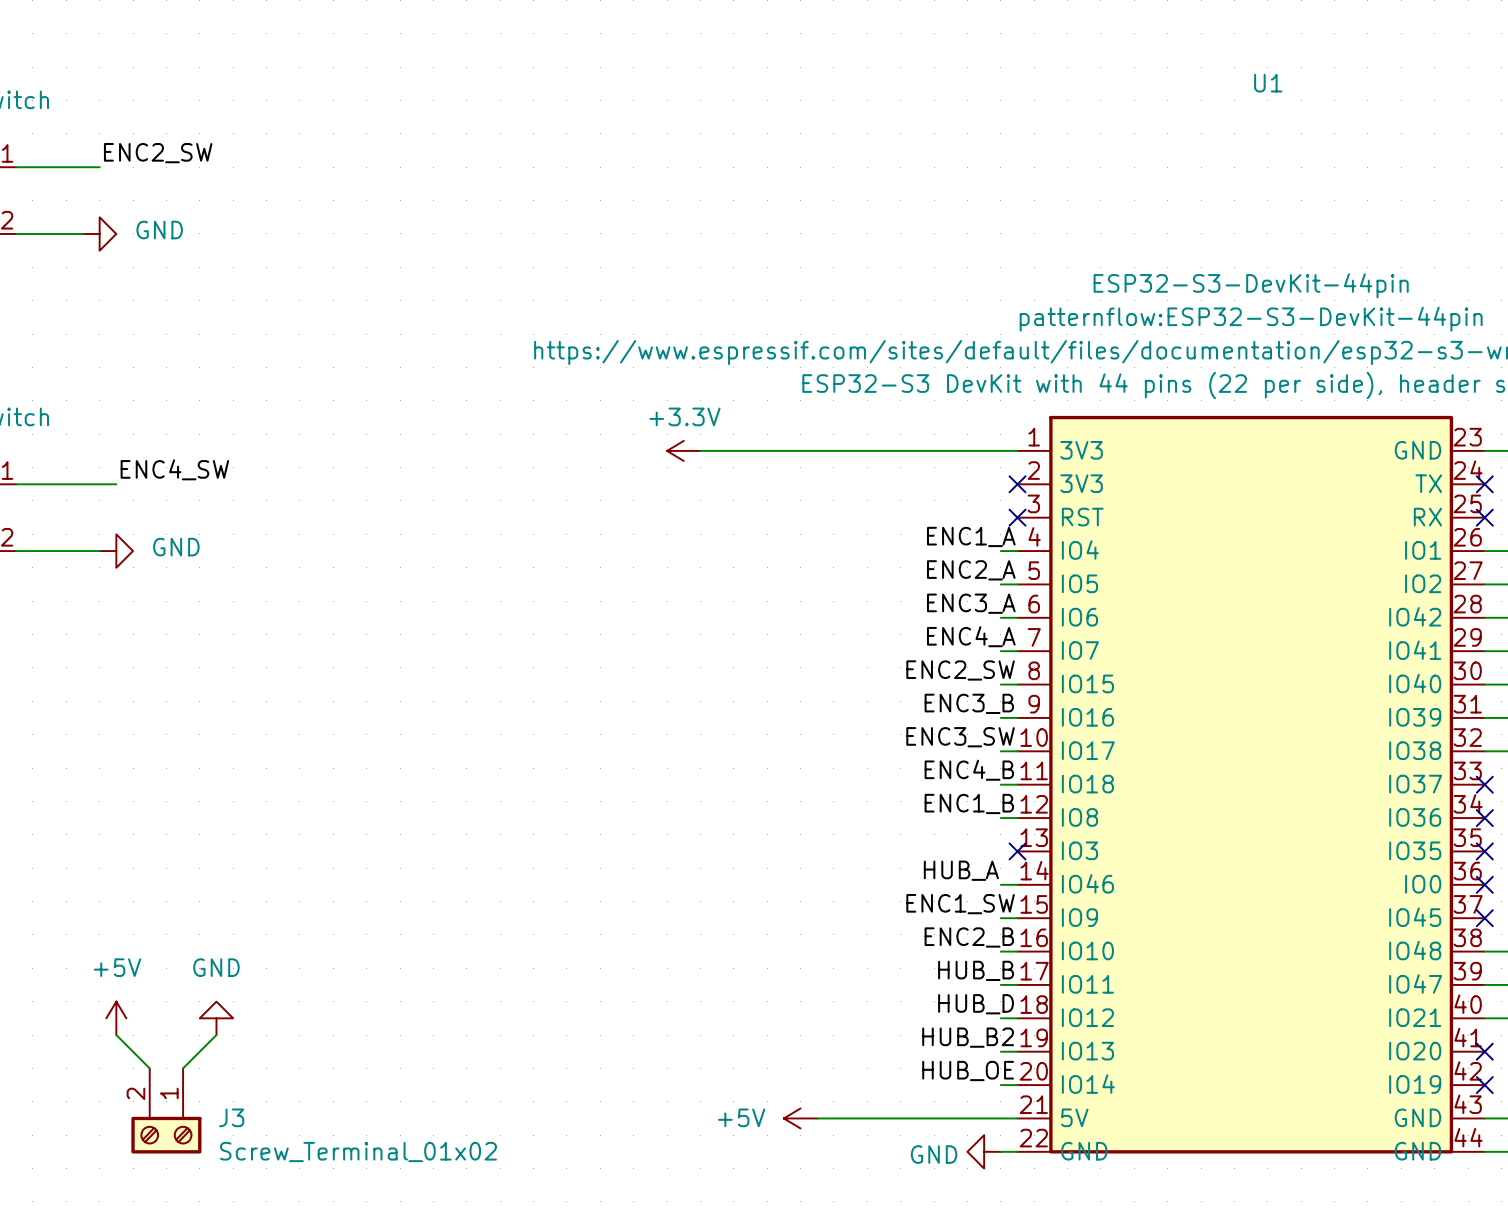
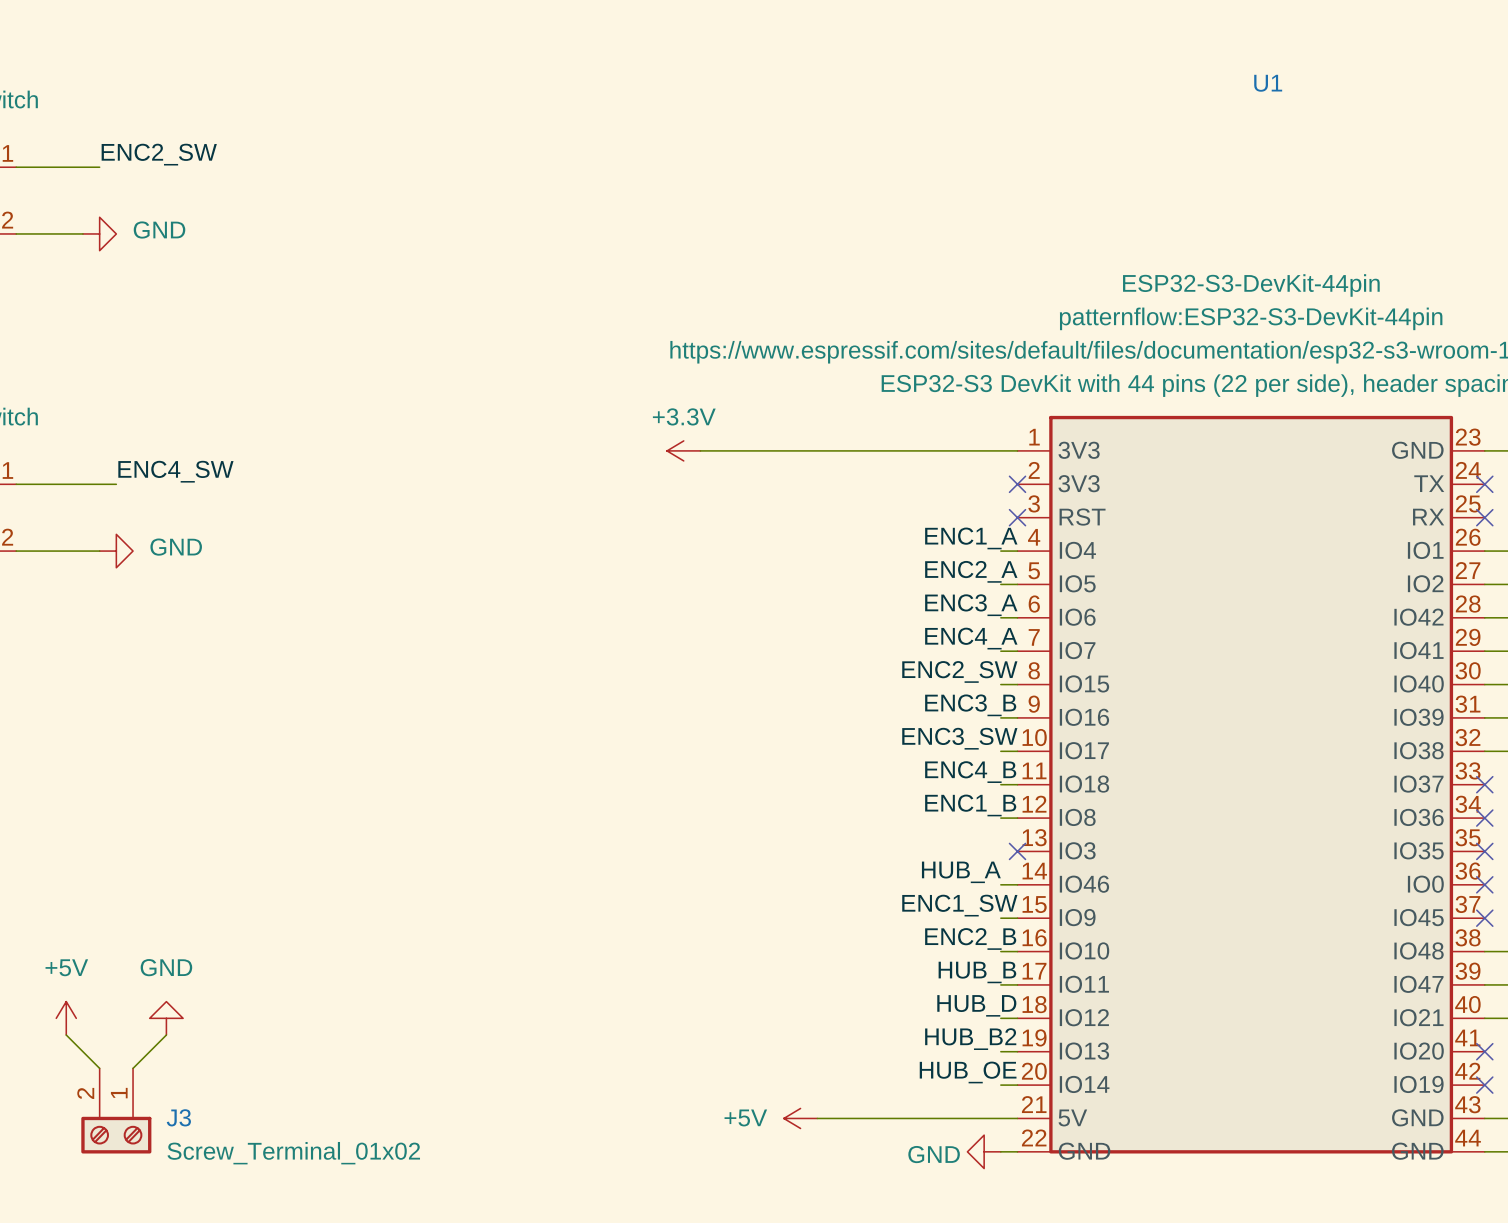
power symbol position: +5V (116, 1018) -> +5V (66, 1018)
power symbol position: GND (216, 1018) -> GND (166, 1018)
wire: (116, 1035) (149, 1068) -> (66, 1035) (99, 1068)
wire: (216, 1035) (183, 1068) -> (166, 1035) (133, 1068)
J3 position: (166, 1110) -> (116, 1110)

